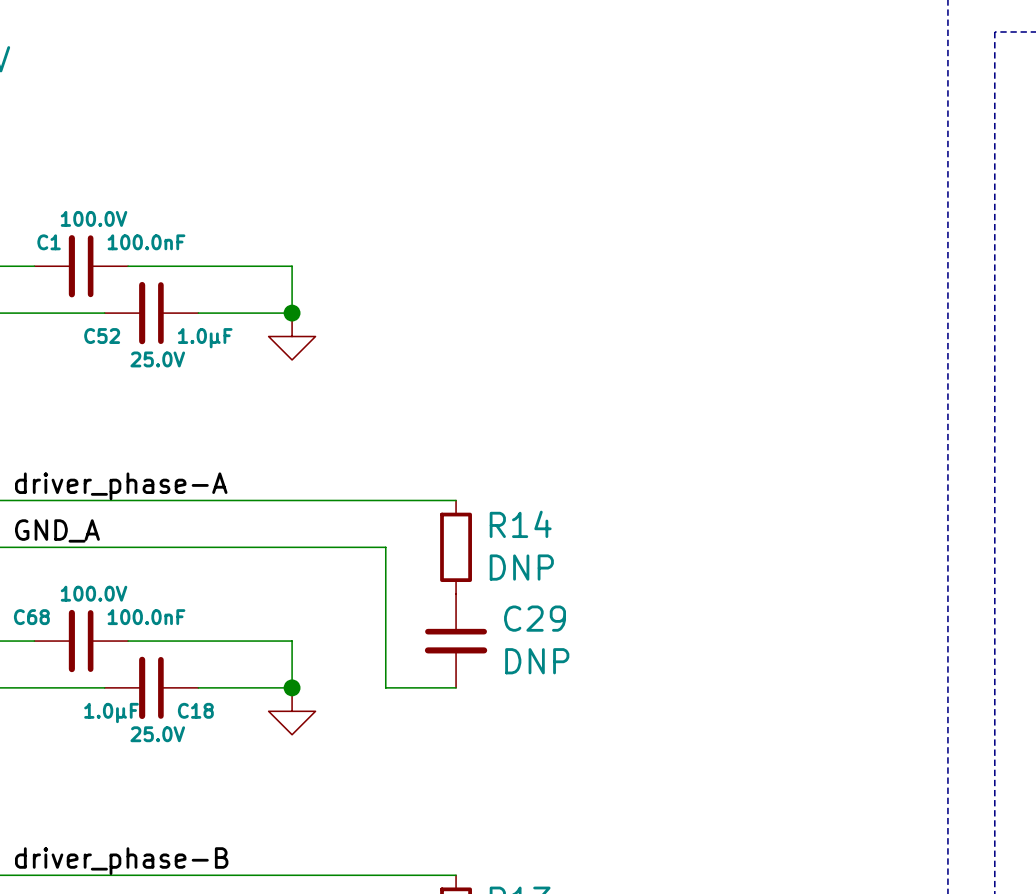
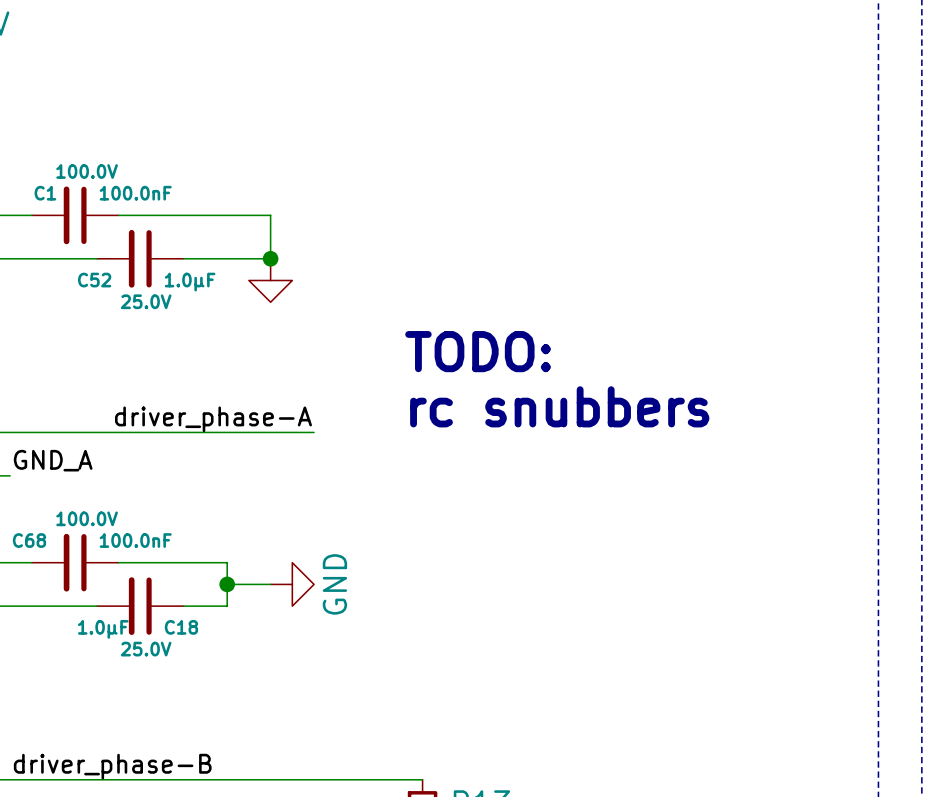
text: none -> TODO: (478, 351)
text: none -> rc snubbers (559, 406)
label position: driver_phase-A (121, 486) -> driver_phase-A (213, 419)
wire: (338, 500) (456, 500) -> none
wire: (10, 547) (385, 547) (385, 687) (456, 687) -> none
R14: DNP (456, 547) -> none
wire: (245, 641) (292, 641) (292, 687) (245, 687) -> (227, 562) (227, 606)
C29: DNP (456, 641) -> none
wire: none -> (227, 584) (270, 584)
power symbol: none -> GND (292, 584)
junction position: (292, 687) -> (227, 584)
power symbol: (292, 711) -> none

